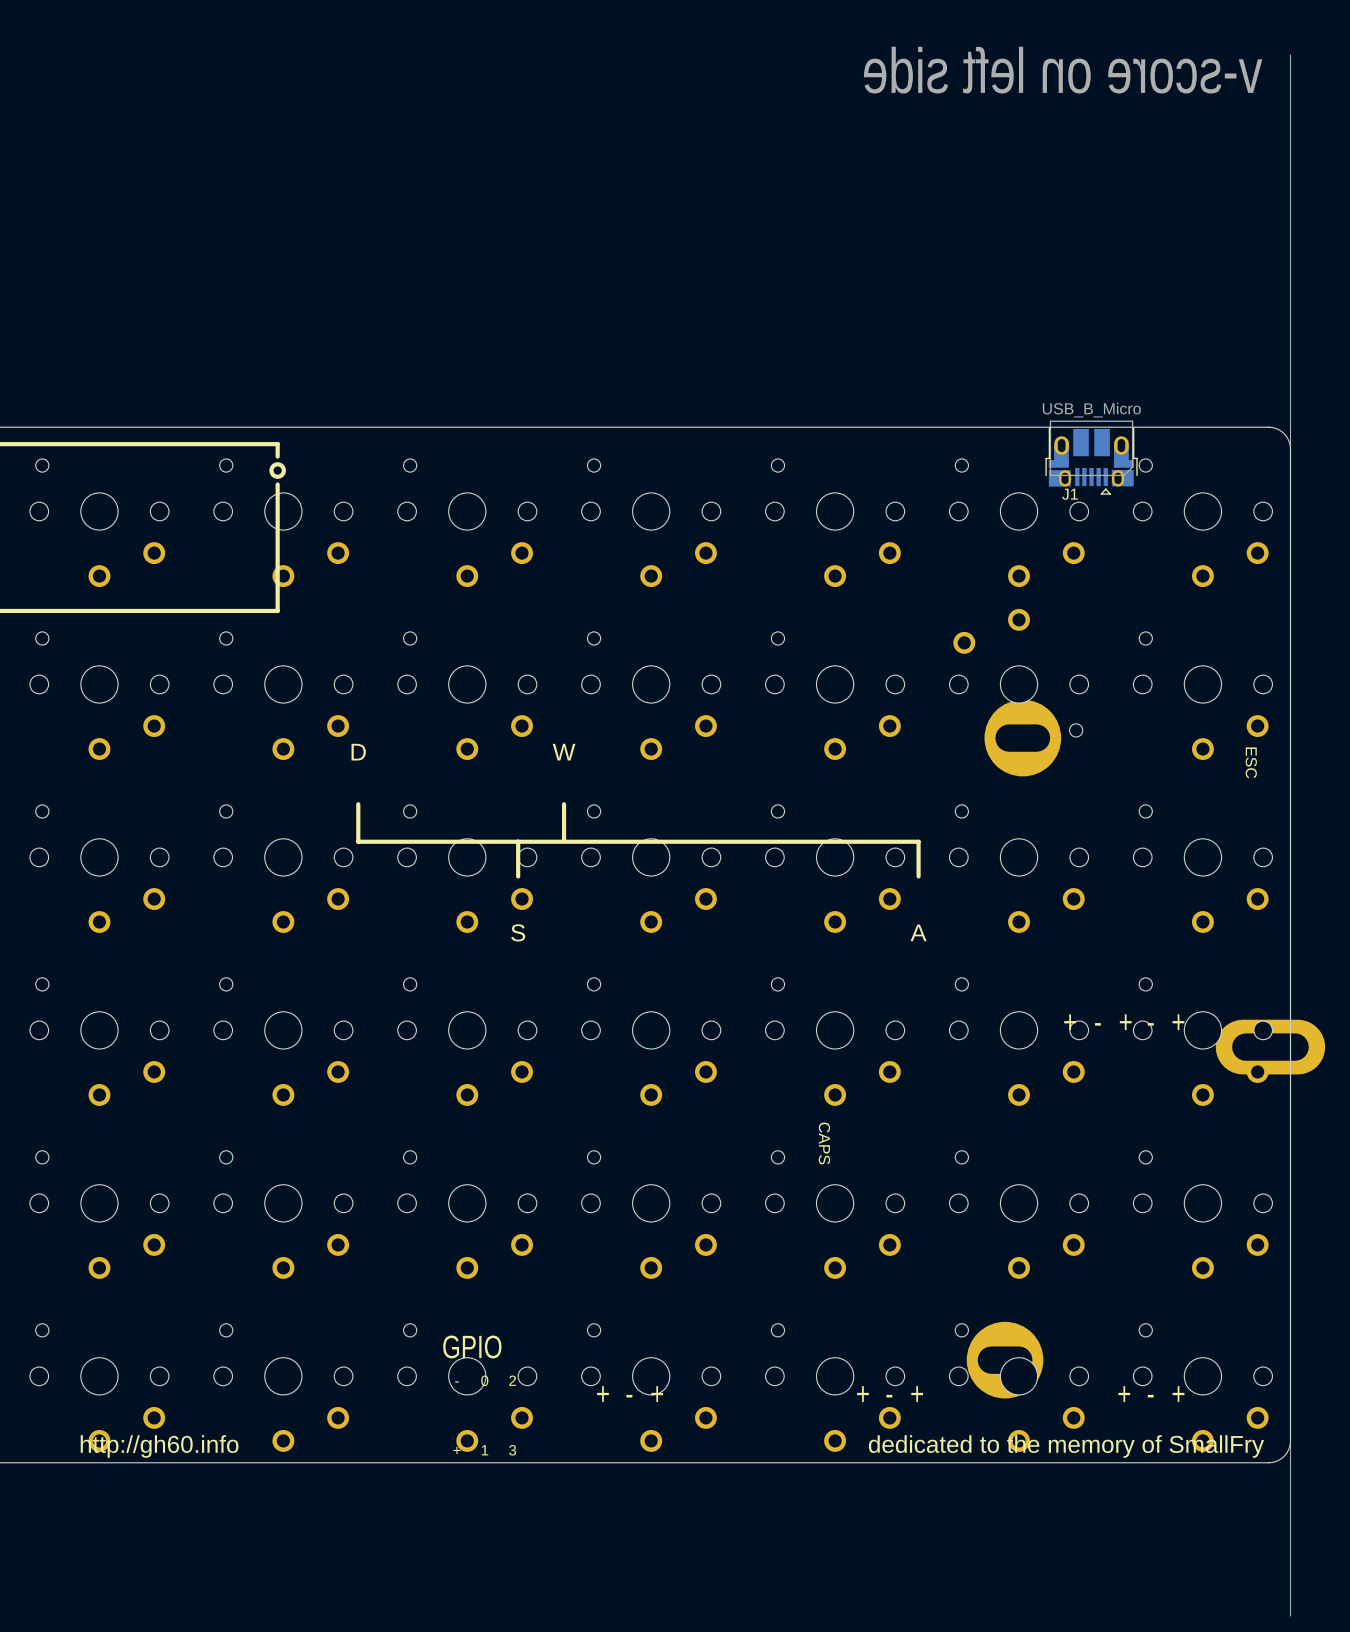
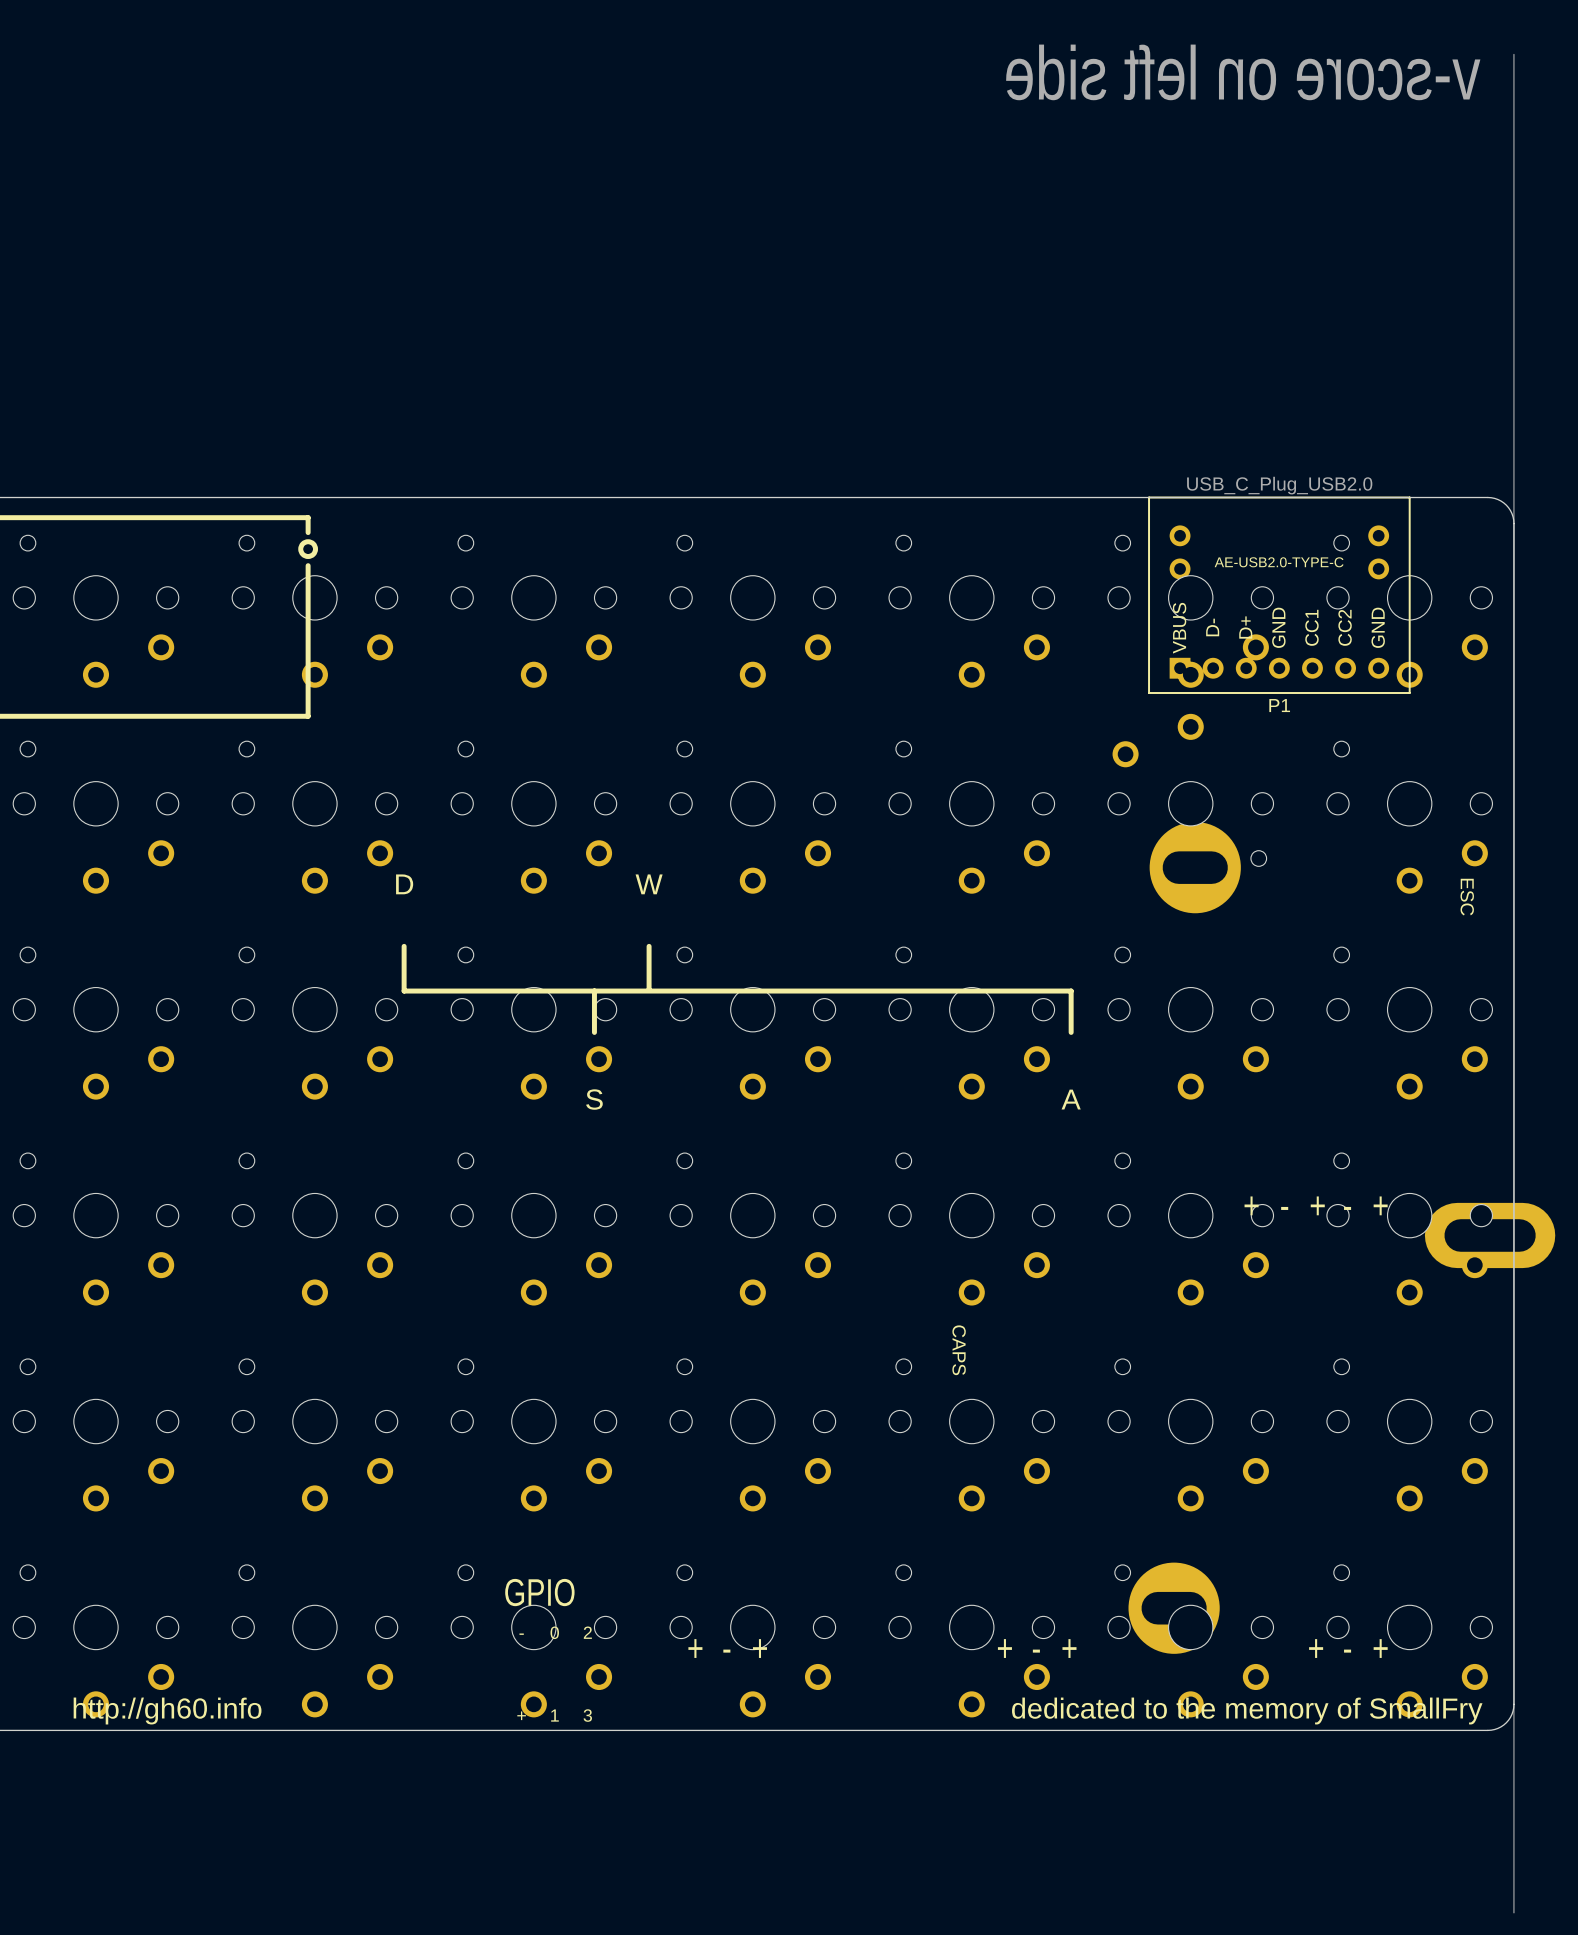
J1: USB_B_Micro (1091, 457) -> none
P1: none -> USB_C_Plug_USB2.0 (1279, 595)

